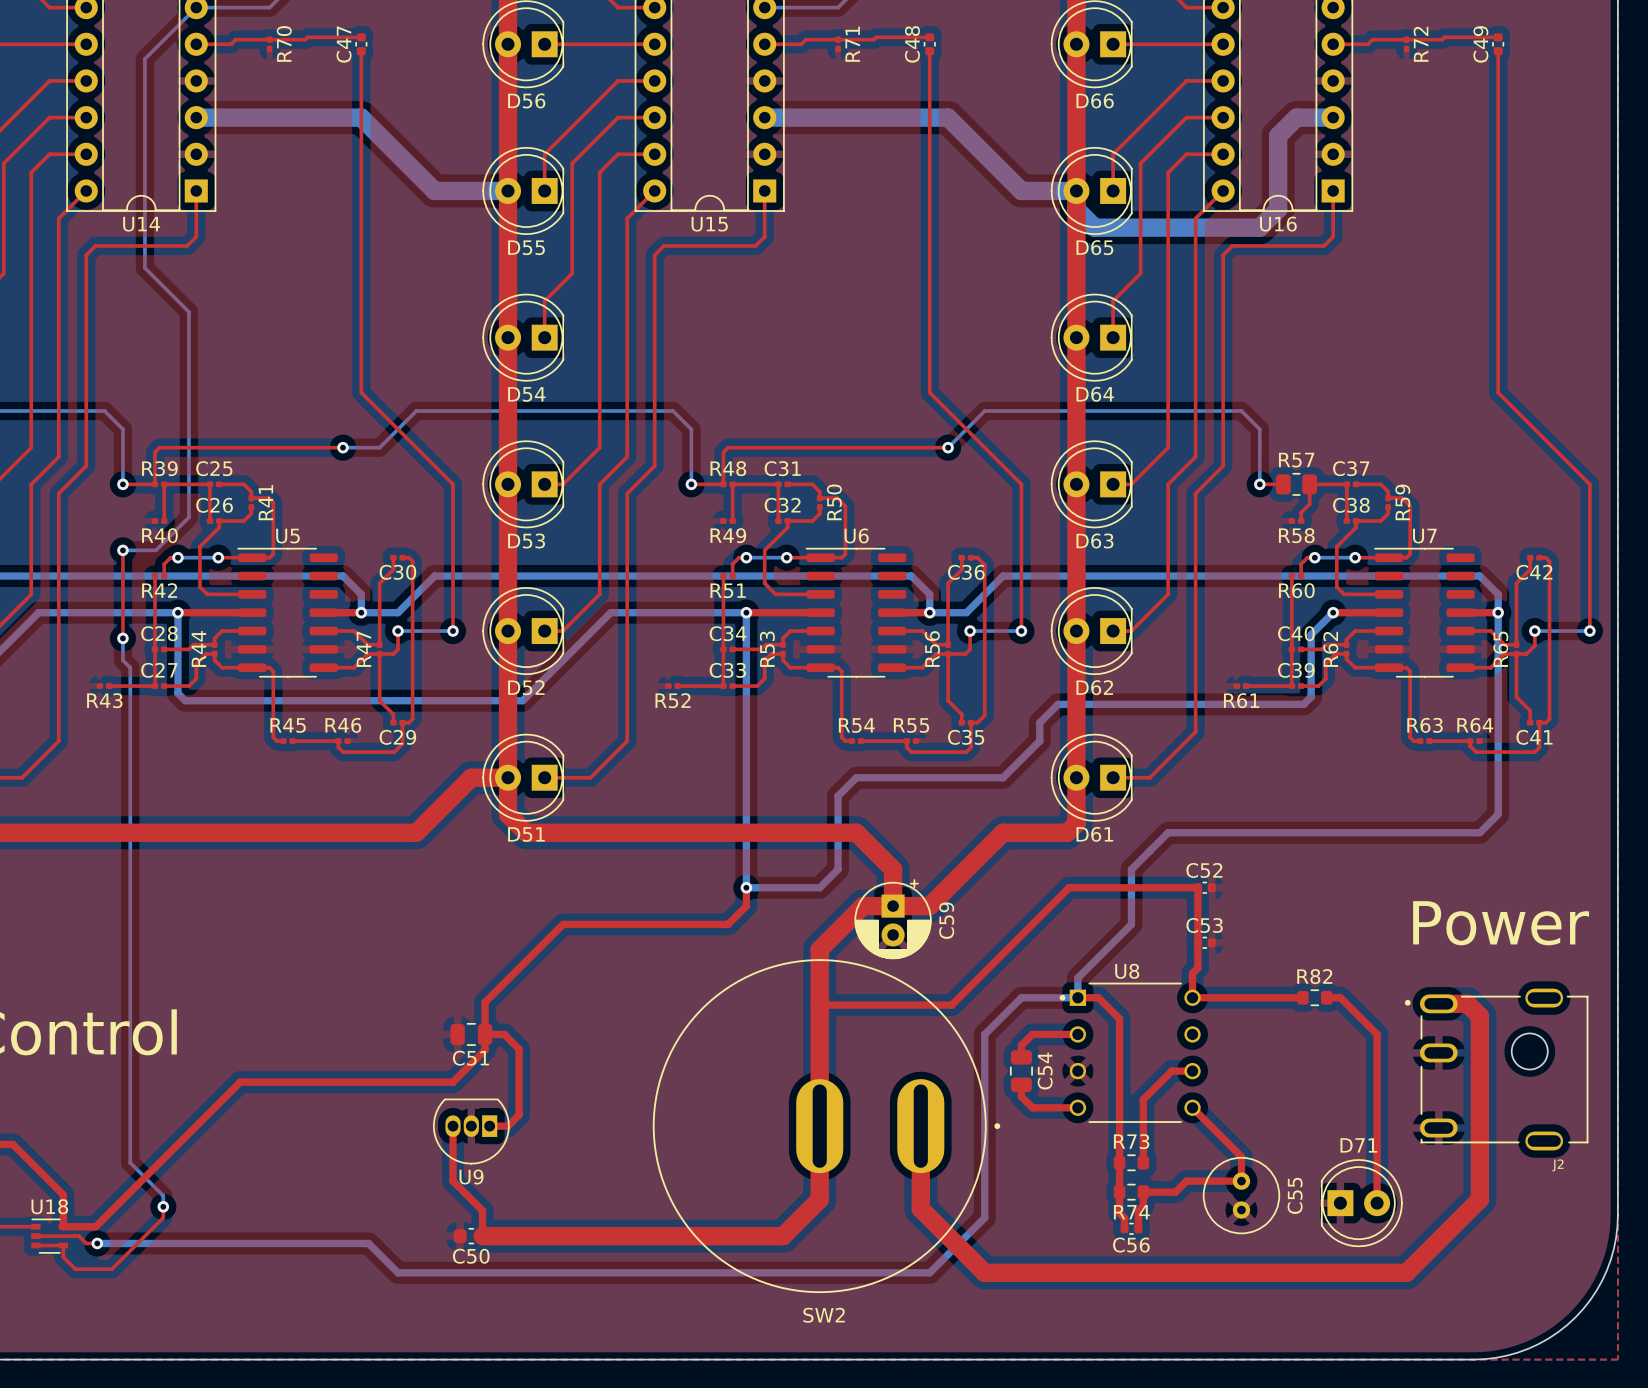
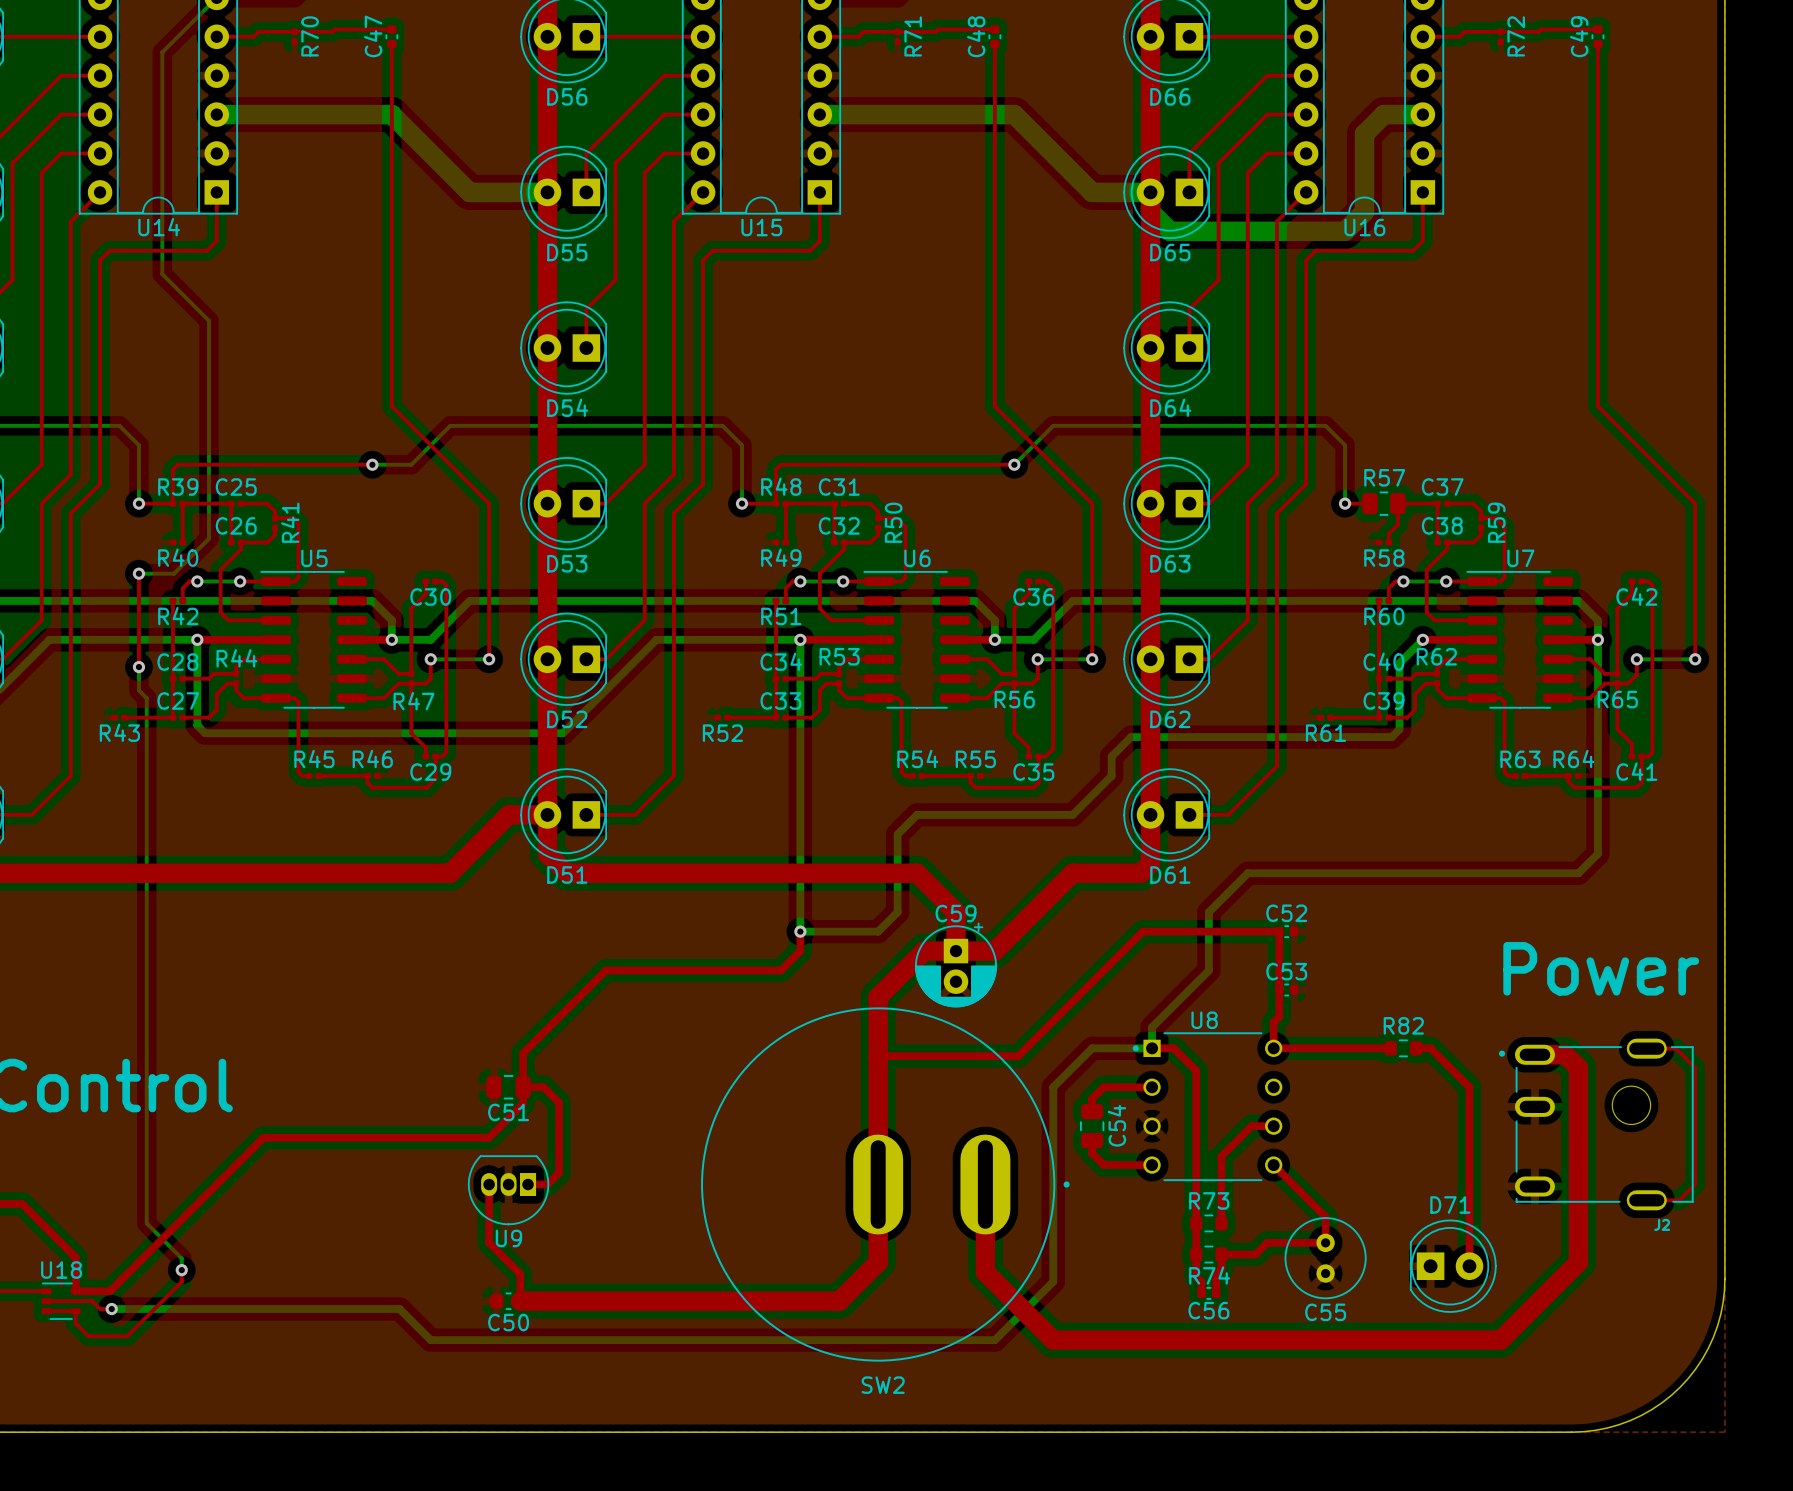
R44 name rotation: 0° (198, 648) -> 90° clockwise (236, 658)
R47 name rotation: 0° (363, 649) -> 90° clockwise (413, 701)
R53 name rotation: 0° (767, 649) -> 90° clockwise (839, 656)
R56 name rotation: 0° (932, 649) -> 90° clockwise (1014, 699)
R62 name rotation: 0° (1330, 649) -> 90° clockwise (1436, 656)
R65 name rotation: 0° (1500, 649) -> 90° clockwise (1617, 699)
C59 name rotation: 0° (946, 920) -> 90° clockwise (956, 913)
C59 name position: C59 (946, 920) -> C59 (956, 913)
top track: none -> (1646, 1048) (1675, 1048) (1695, 1067) (1695, 1184) (1679, 1200) (1646, 1200)
C55 name rotation: 0° (1295, 1195) -> 90° clockwise (1325, 1312)
C55 name position: C55 (1295, 1195) -> C55 (1325, 1312)

